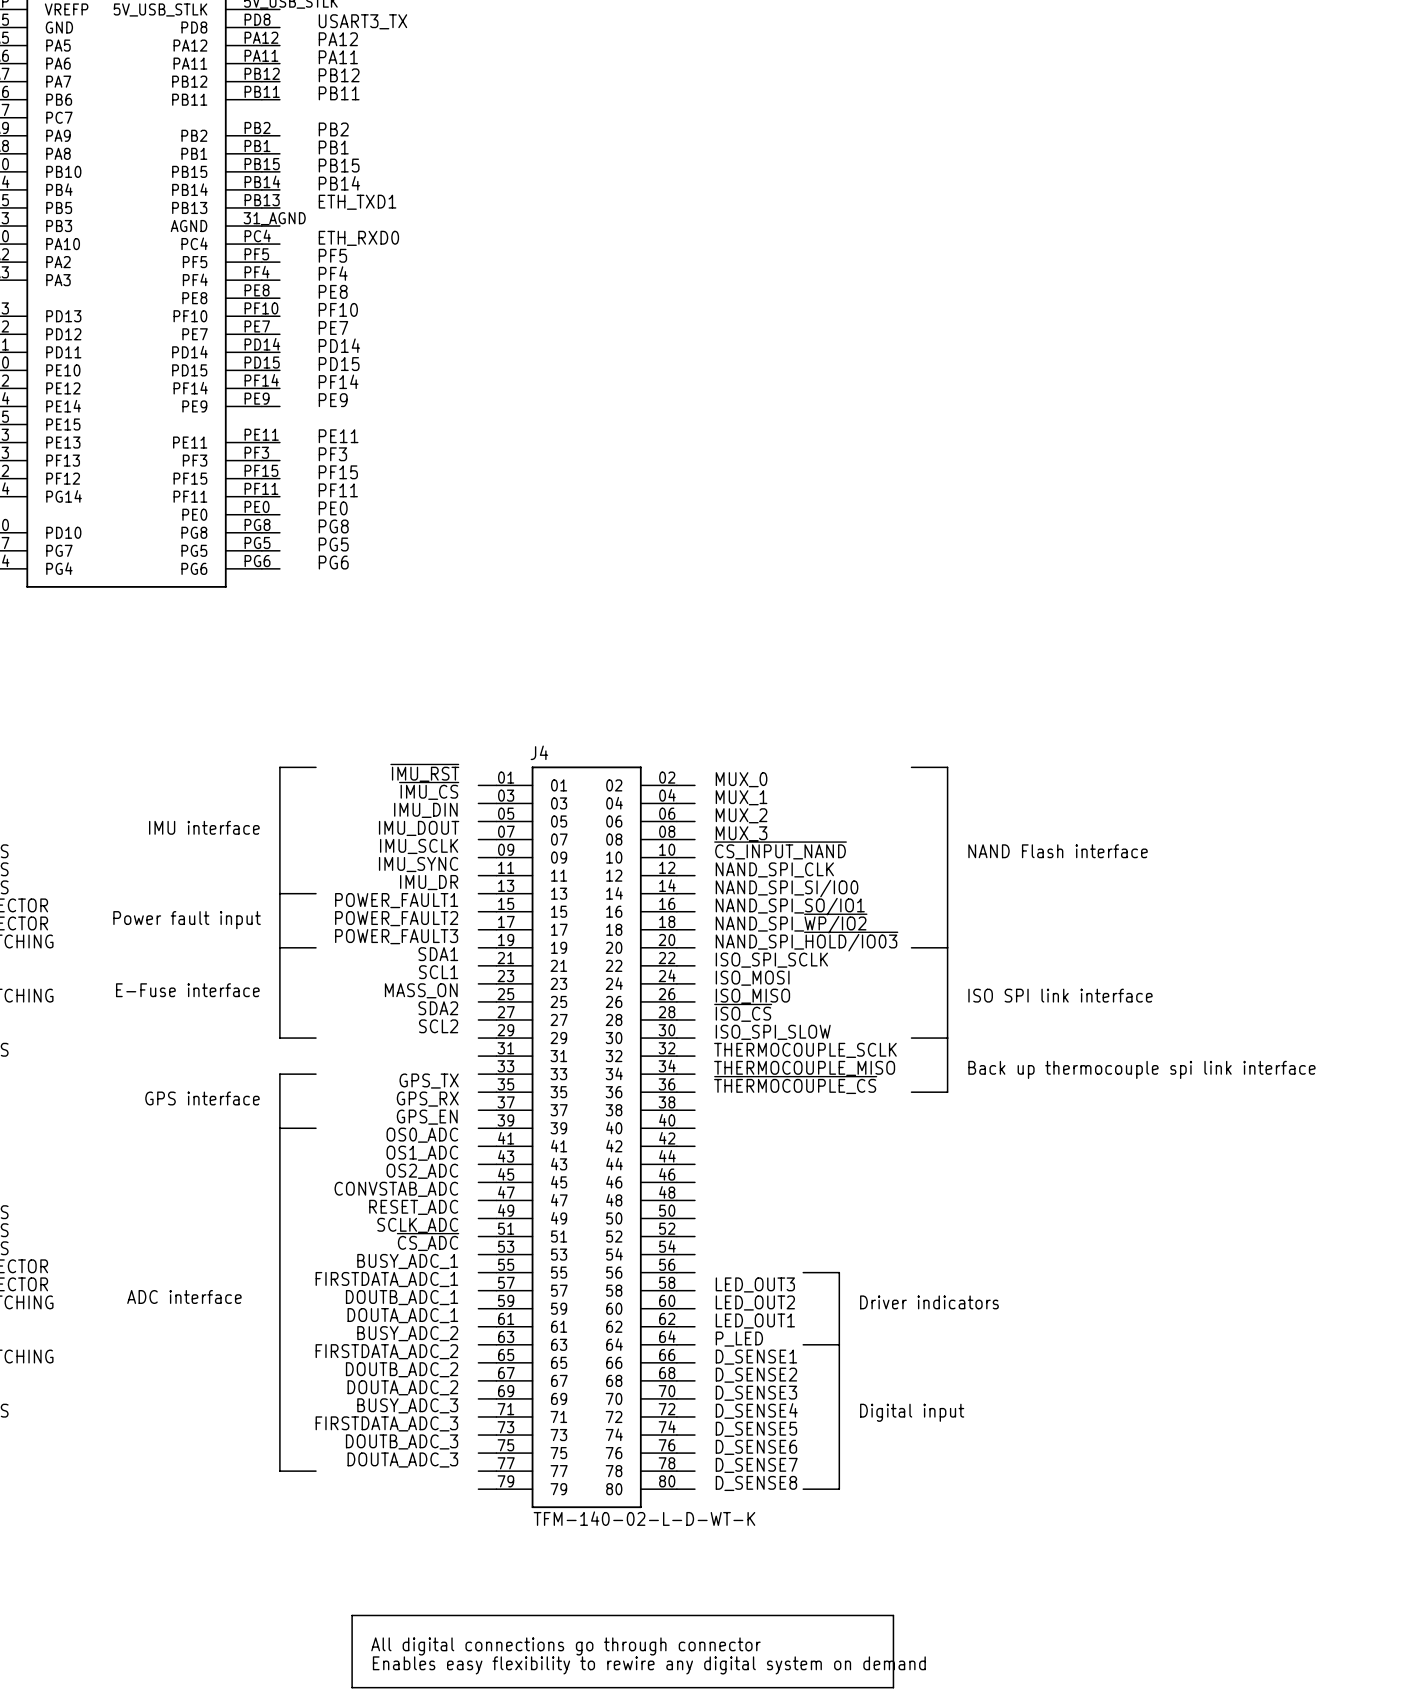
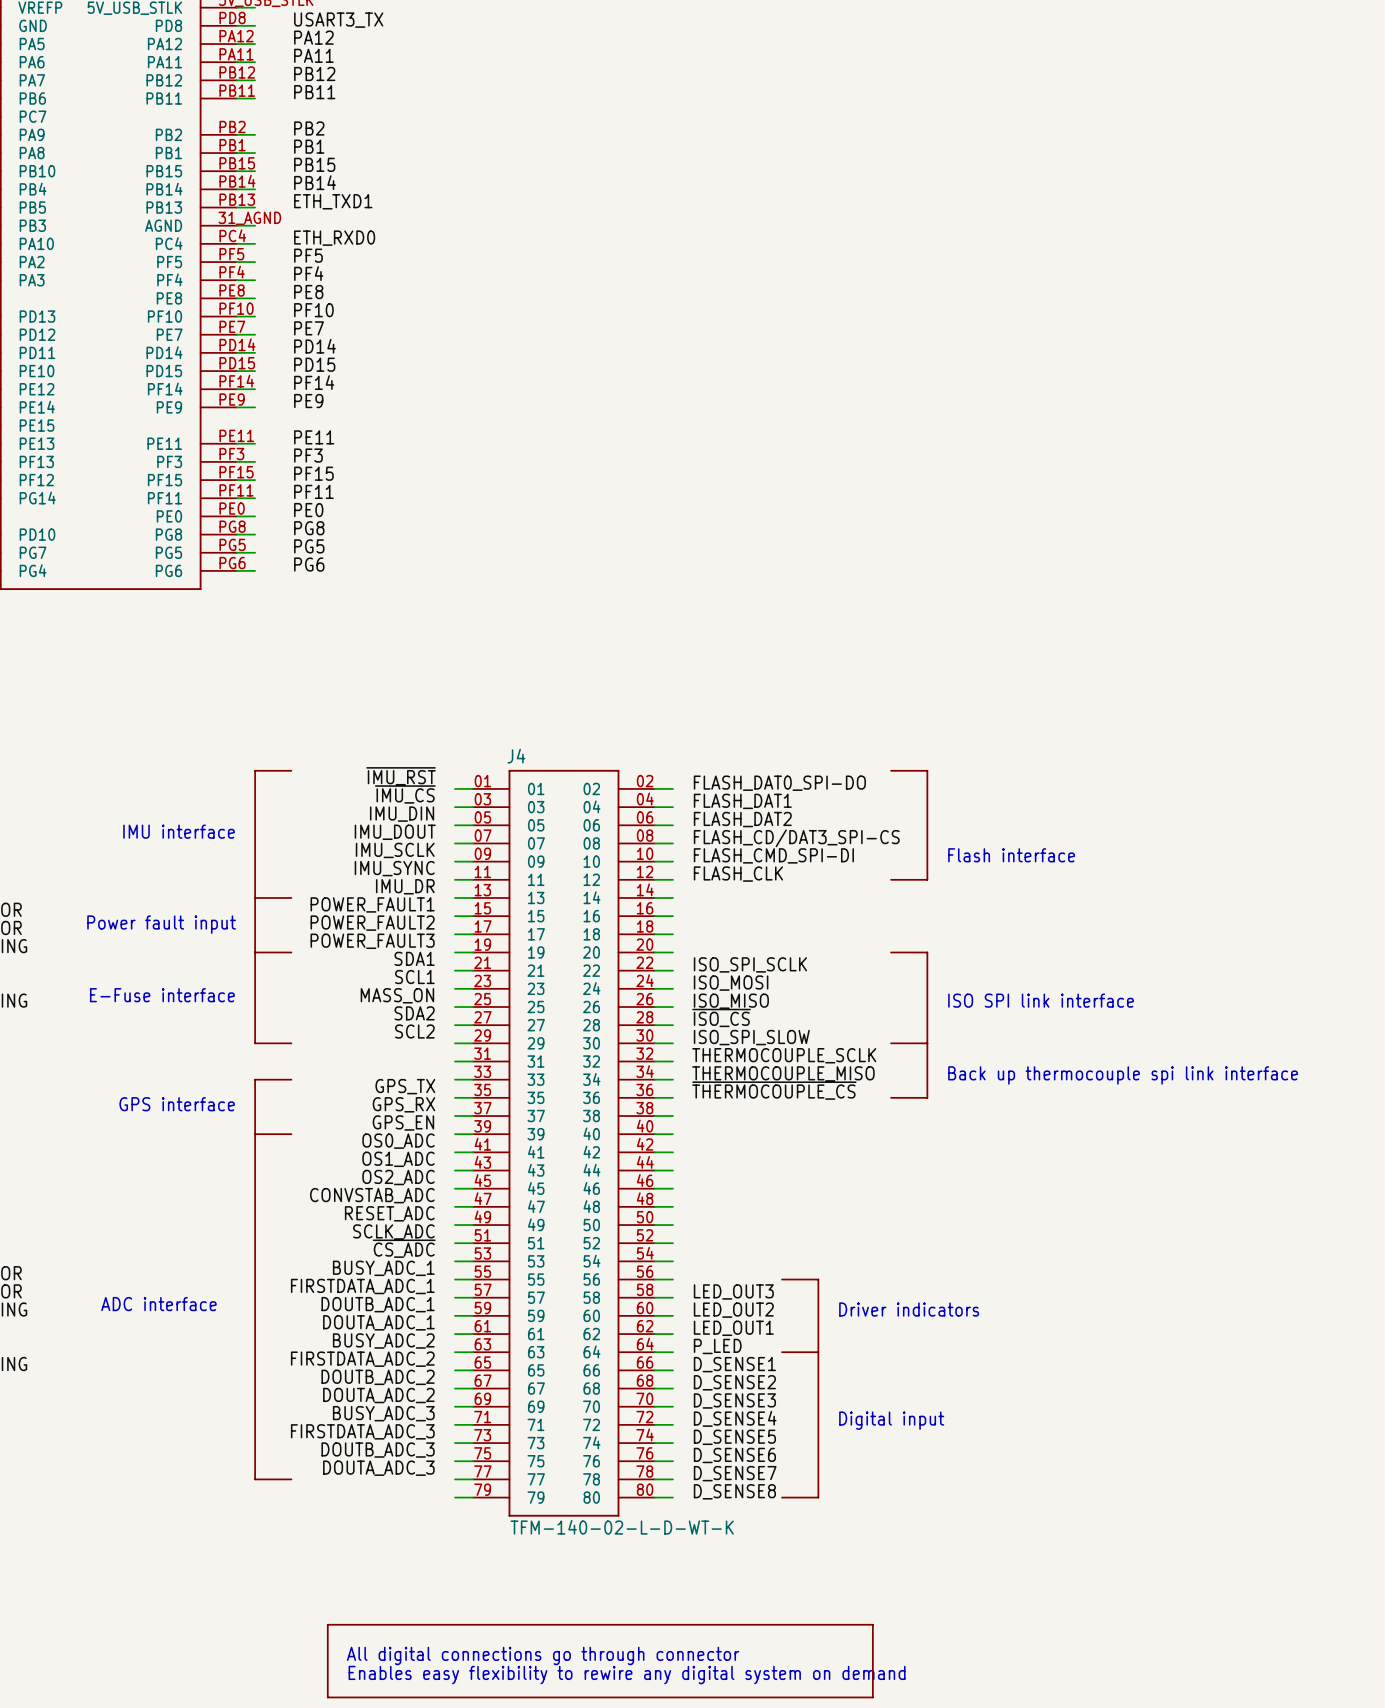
label: MUX_0 (741, 779) -> FLASH_DAT0_SPI-DO (779, 783)
label: MUX_1 (741, 797) -> FLASH_DAT1 (742, 801)
label: MUX_2 (741, 815) -> FLASH_DAT2 (742, 819)
label: MUX_3 (741, 833) -> FLASH_CD/DAT3_SPI-CS (796, 838)
label: ~{CS_INPUT_NAND} (780, 850) -> FLASH_CMD_SPI-DI (773, 855)
text: NAND Flash interface (1058, 851) -> Flash interface (1011, 855)
label: NAND_SPI_CLK (774, 869) -> FLASH_CLK (738, 874)
line: (947, 875) (947, 947) -> (927, 879) (891, 879)
label: NAND_SPI_SI/IO0 (787, 888) -> none
label: NAND_SPI_SO/IO1 (790, 906) -> none
label: NAND_SPI_~{WP/IO2} (791, 923) -> none
label: NAND_SPI_~{HOLD/IO03} (807, 941) -> none

